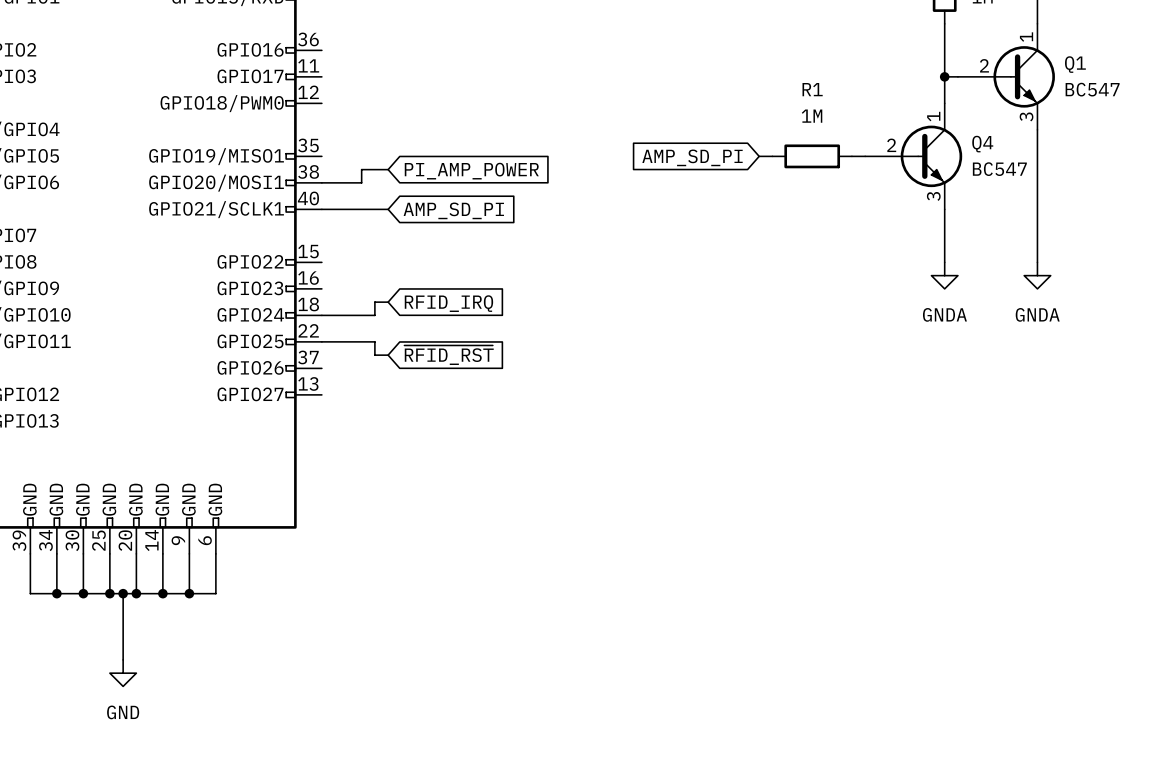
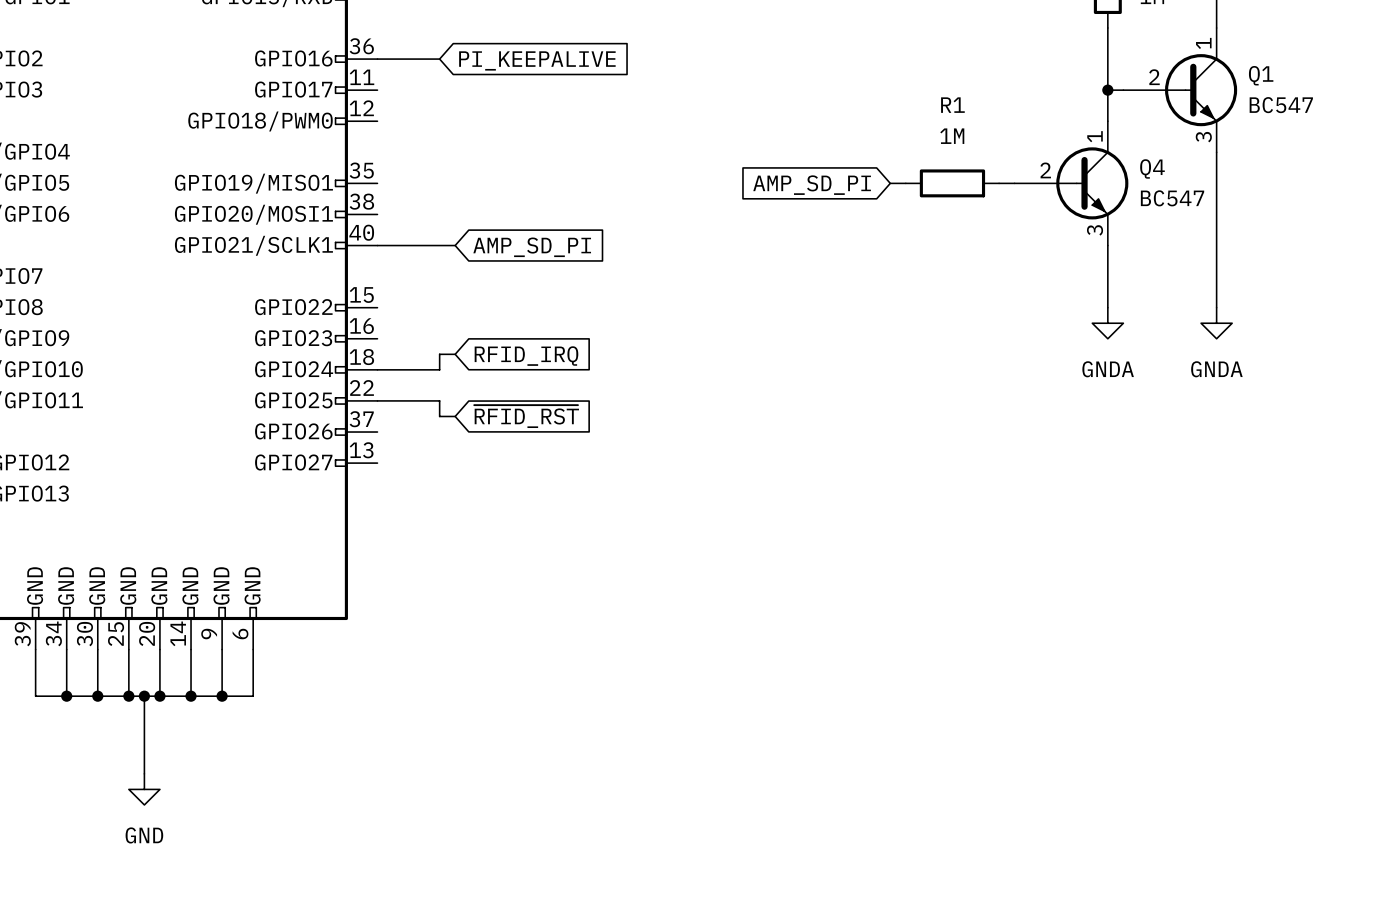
wire: none -> (377, 59) (439, 59)
global label: none -> PI_KEEPALIVE (537, 60)
wire: (388, 169) (361, 169) (361, 182) (321, 182) -> none
global label: PI_AMP_POWER (471, 171) -> none

